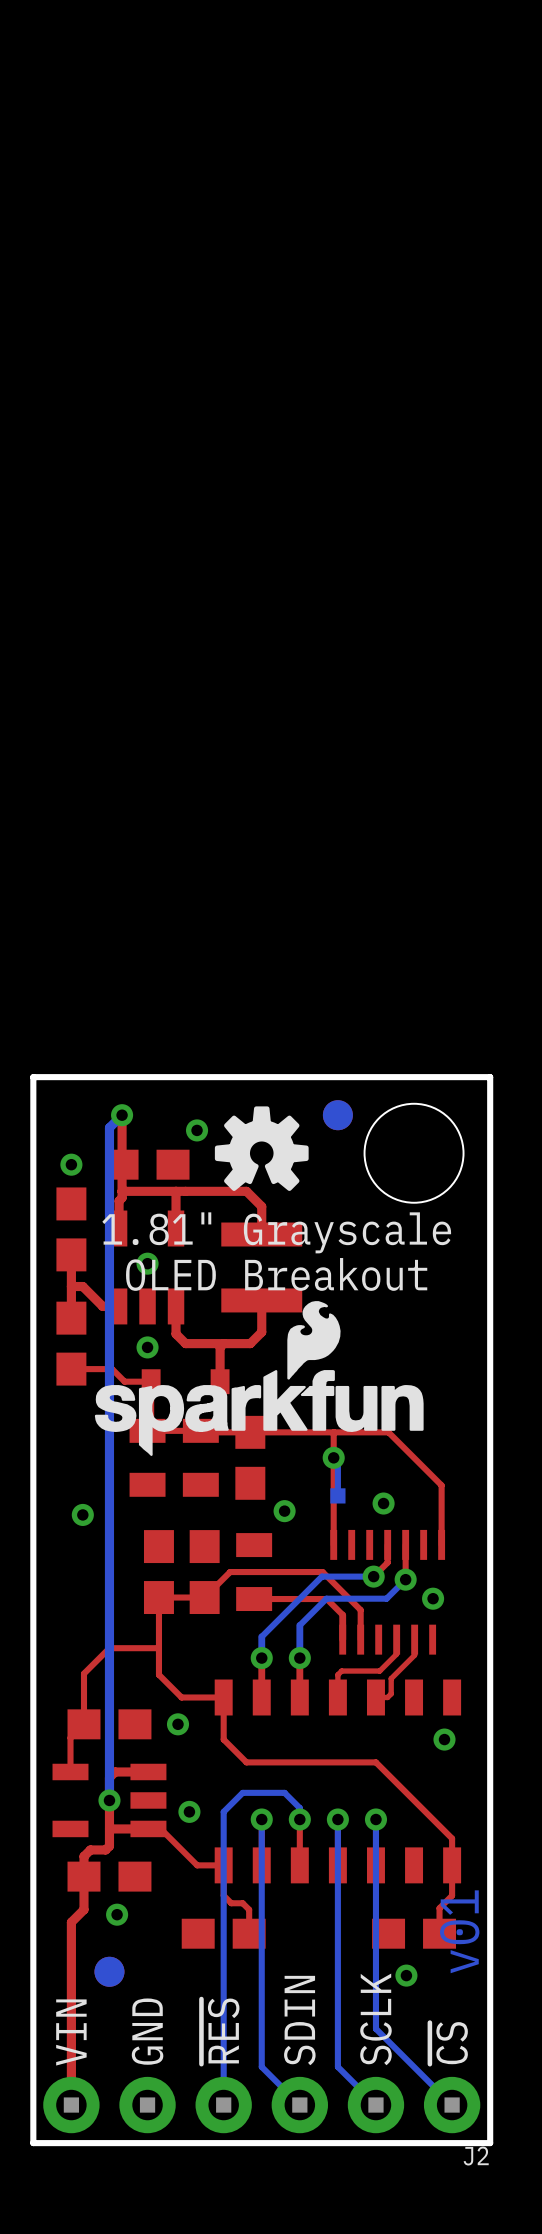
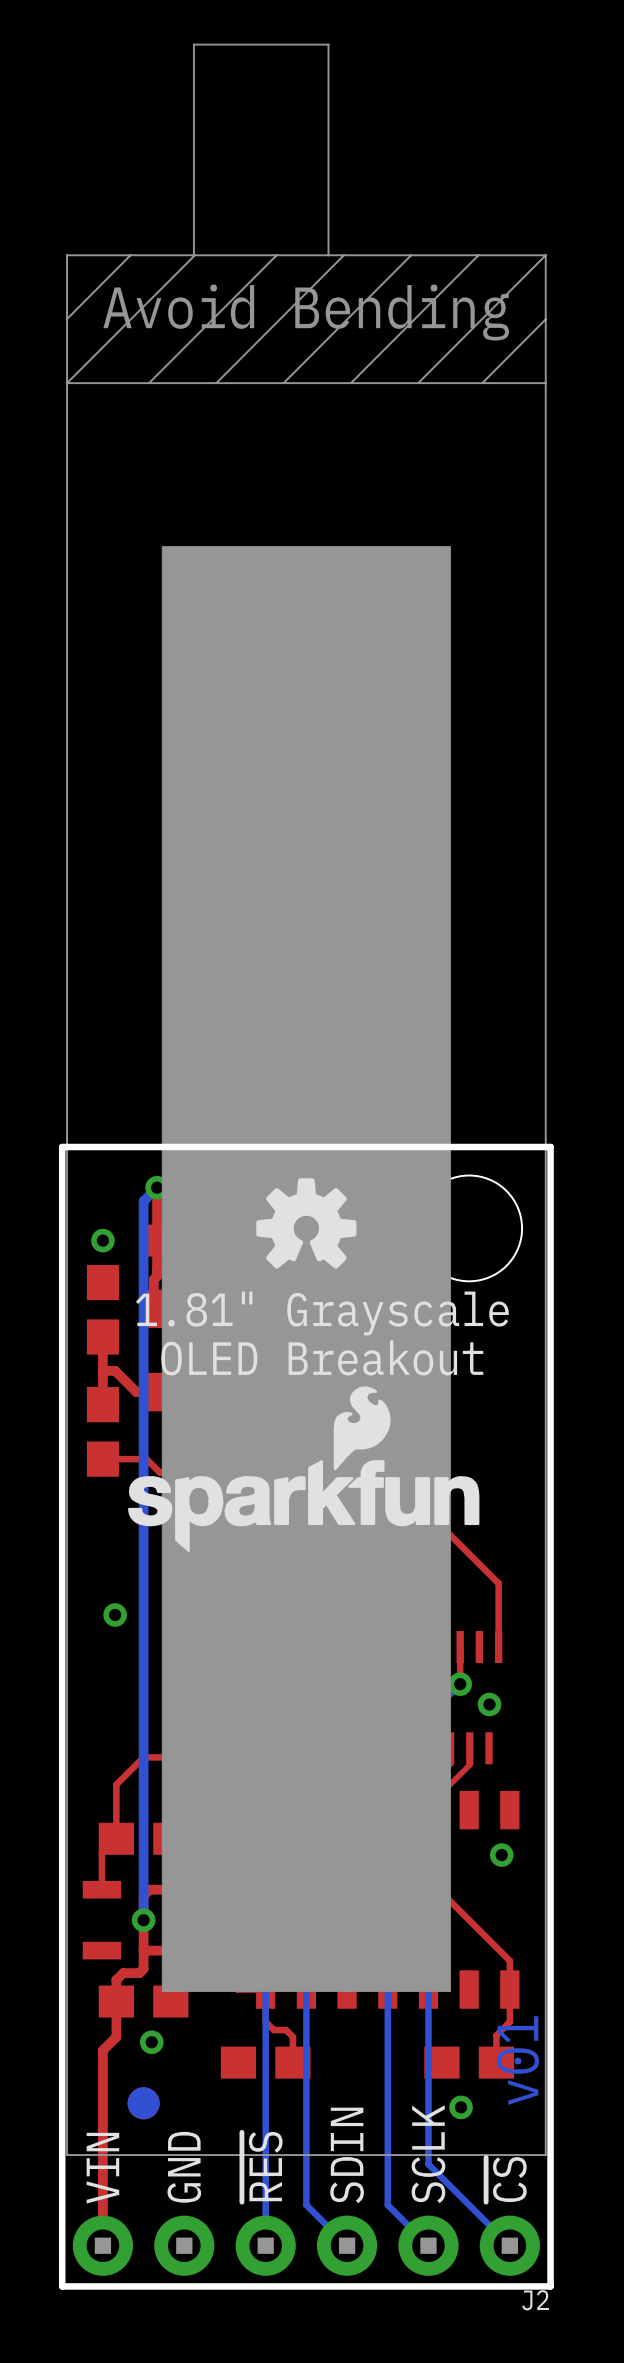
part: none -> (306, 1099)
part: (387, 1592) -> none

